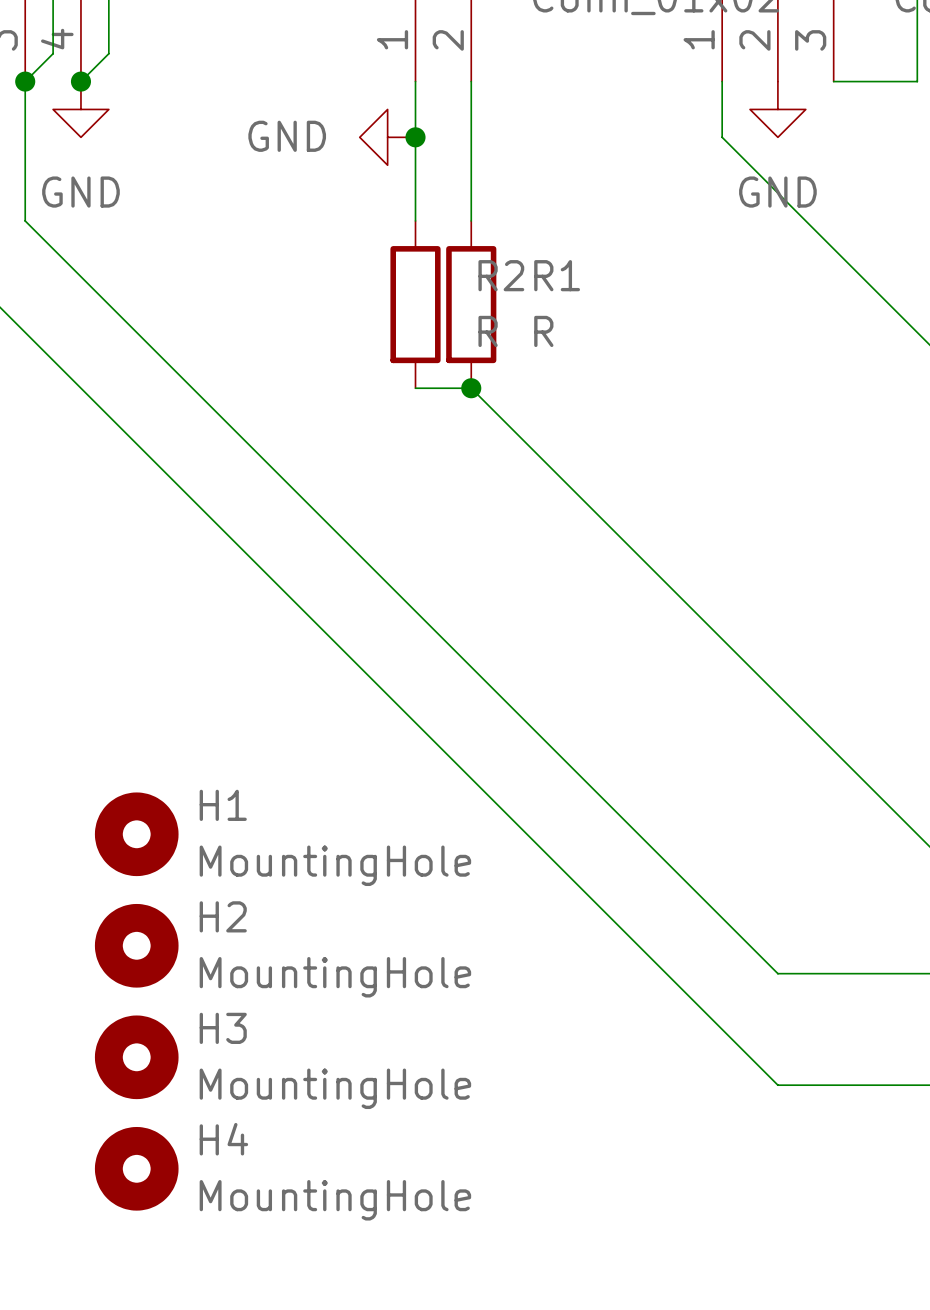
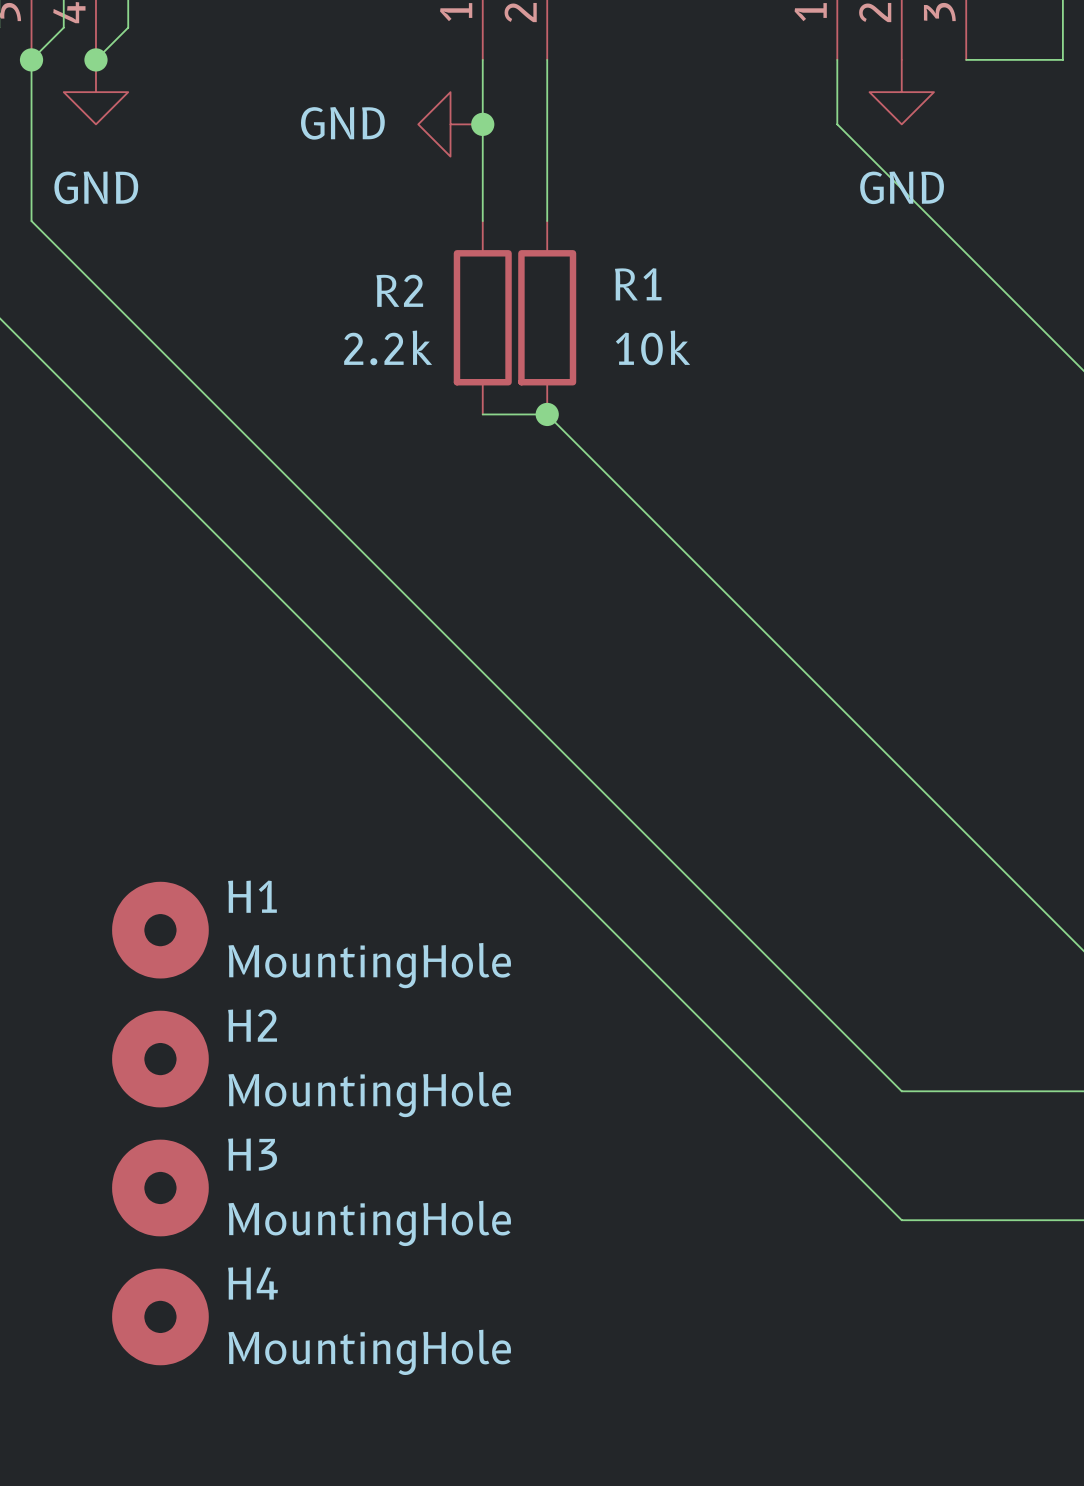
R2 name position: R2 (501, 275) -> R2 (399, 290)
R2 value: R (488, 331) -> 2.2k (388, 347)
R1 value: R (543, 331) -> 10k (652, 347)

